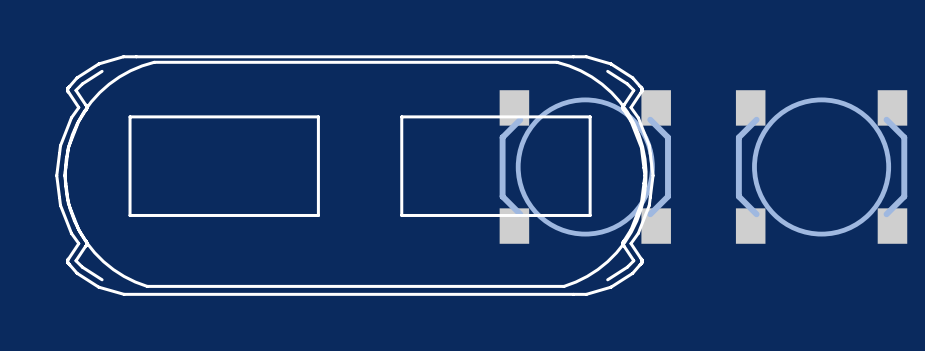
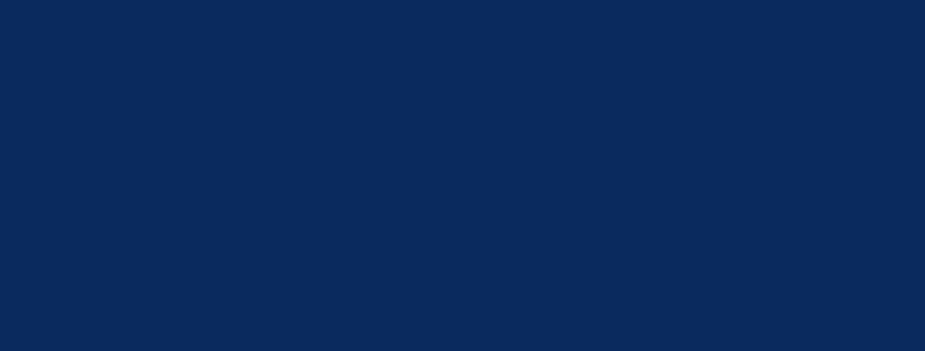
drawing: [55, 55, 655, 296] -> none
part: (585, 167) -> none
part: (821, 167) -> none

